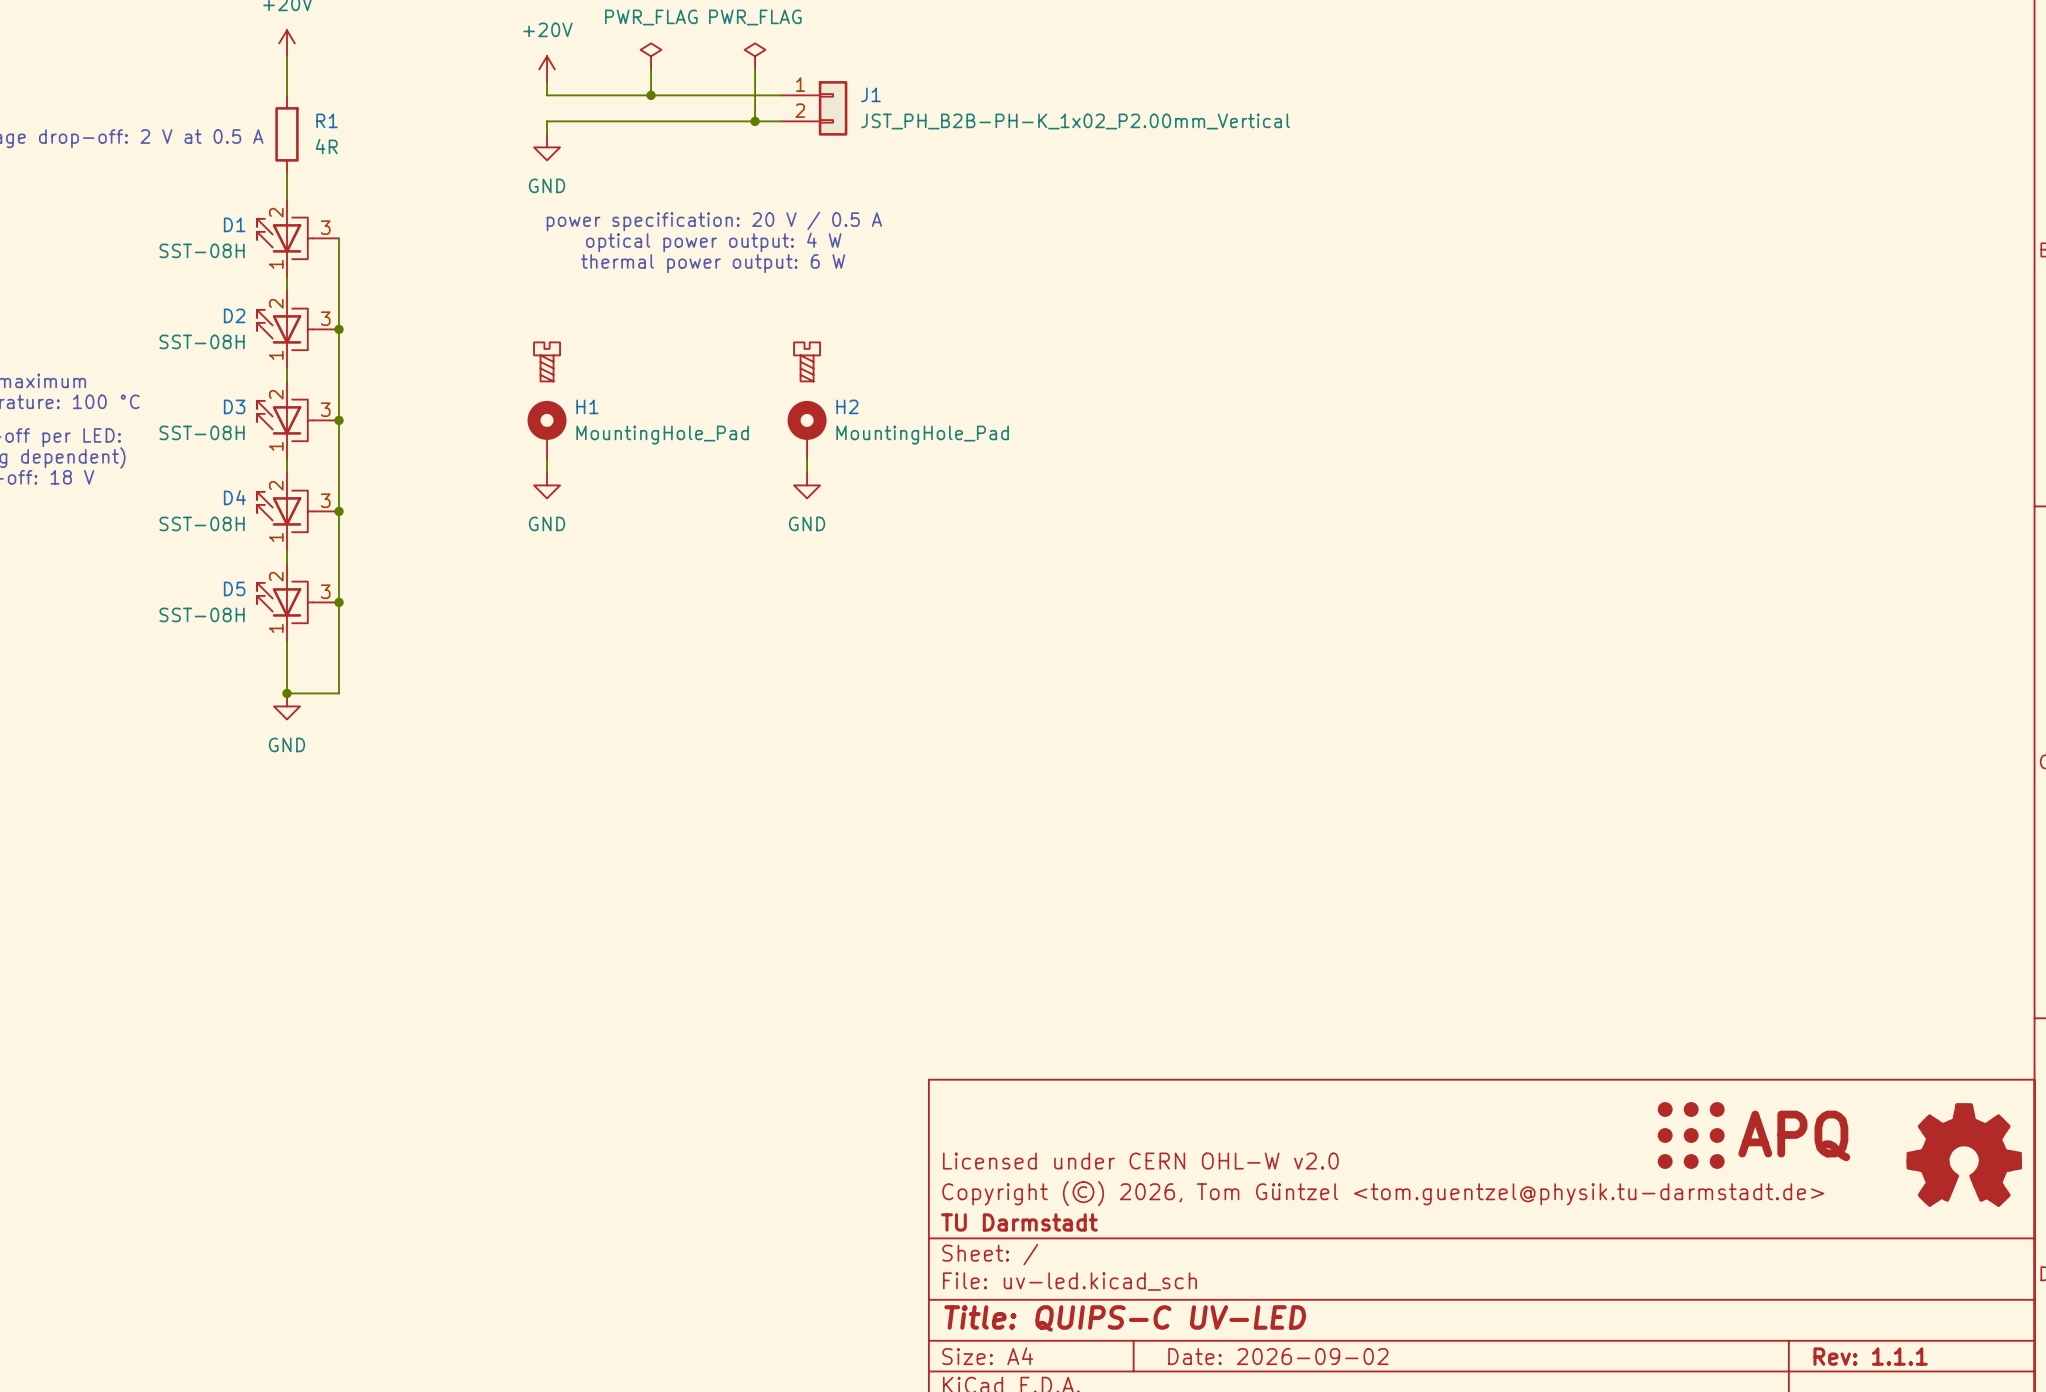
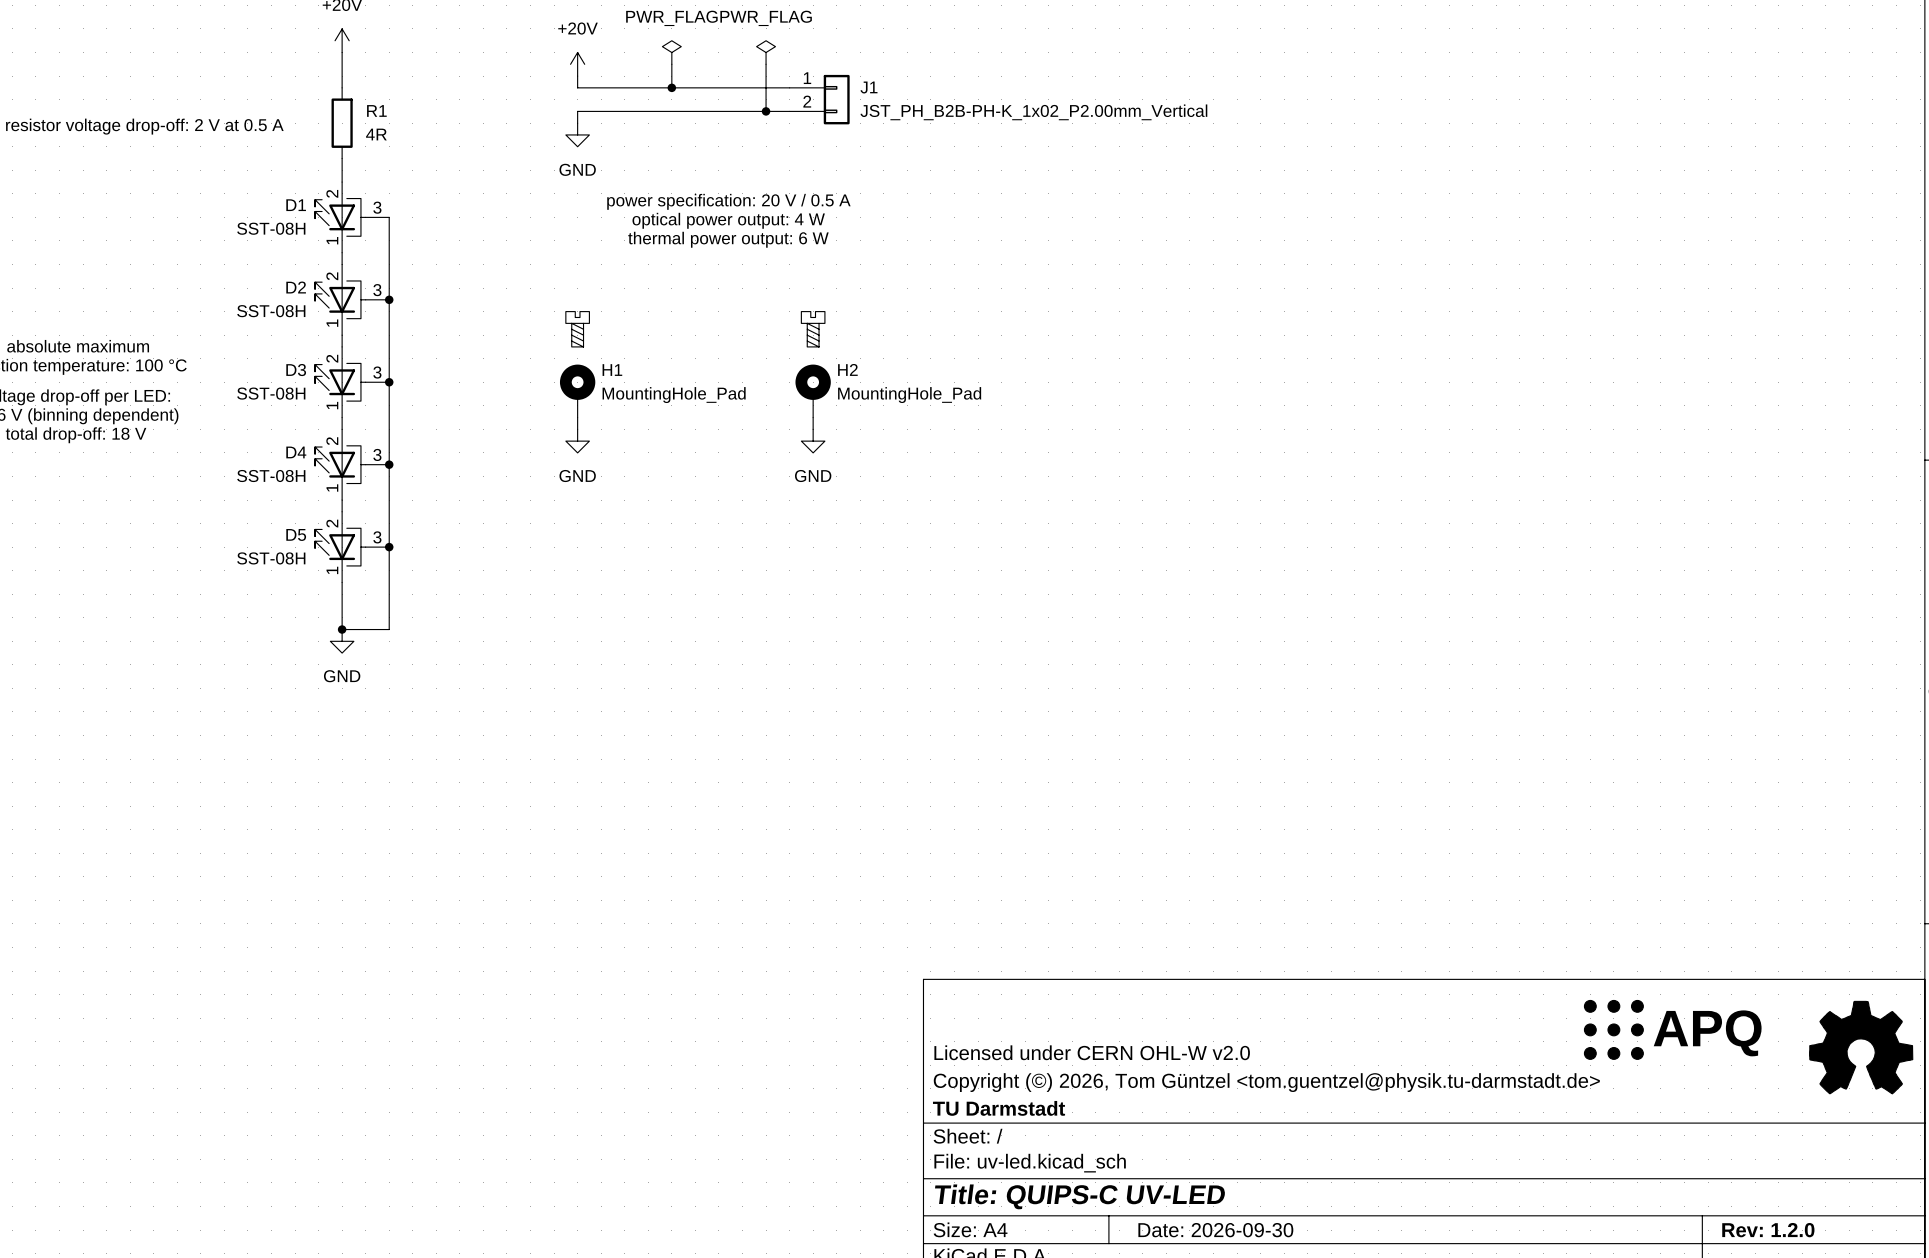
title block: Date: 2026-09-02 (1278, 1356) -> Date: 2026-09-30 (1215, 1230)
title block: Rev: 1.1.1 (1870, 1356) -> Rev: 1.2.0 (1768, 1230)

